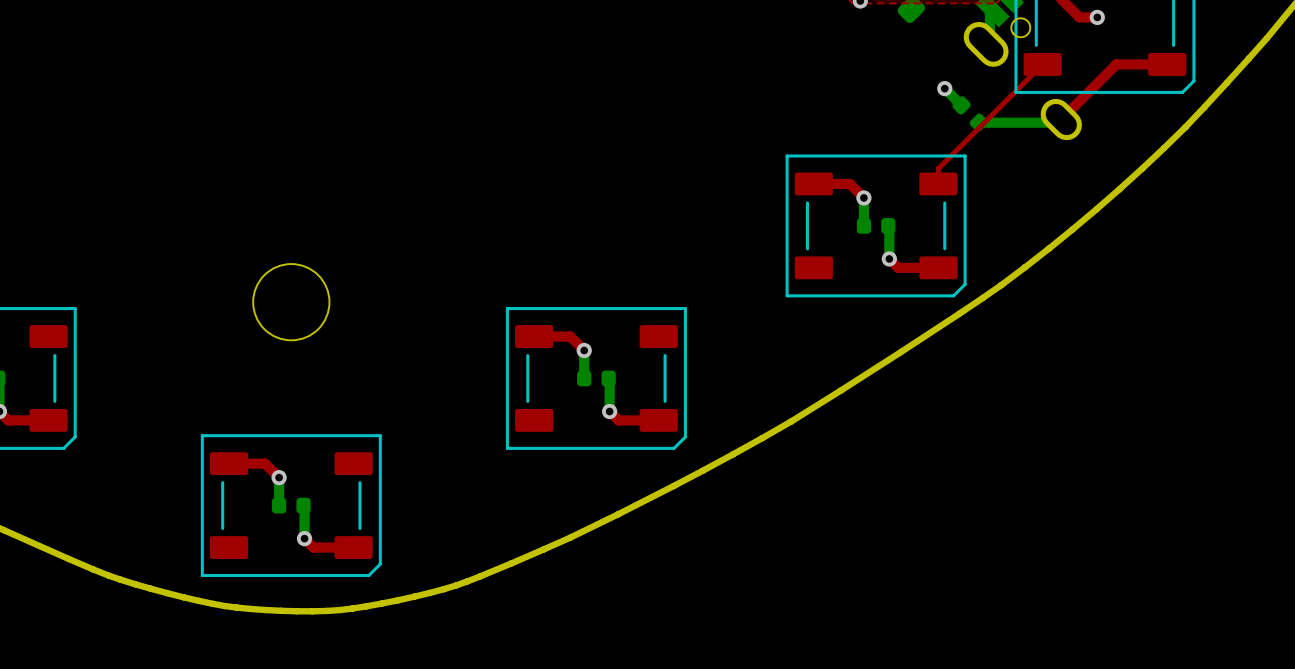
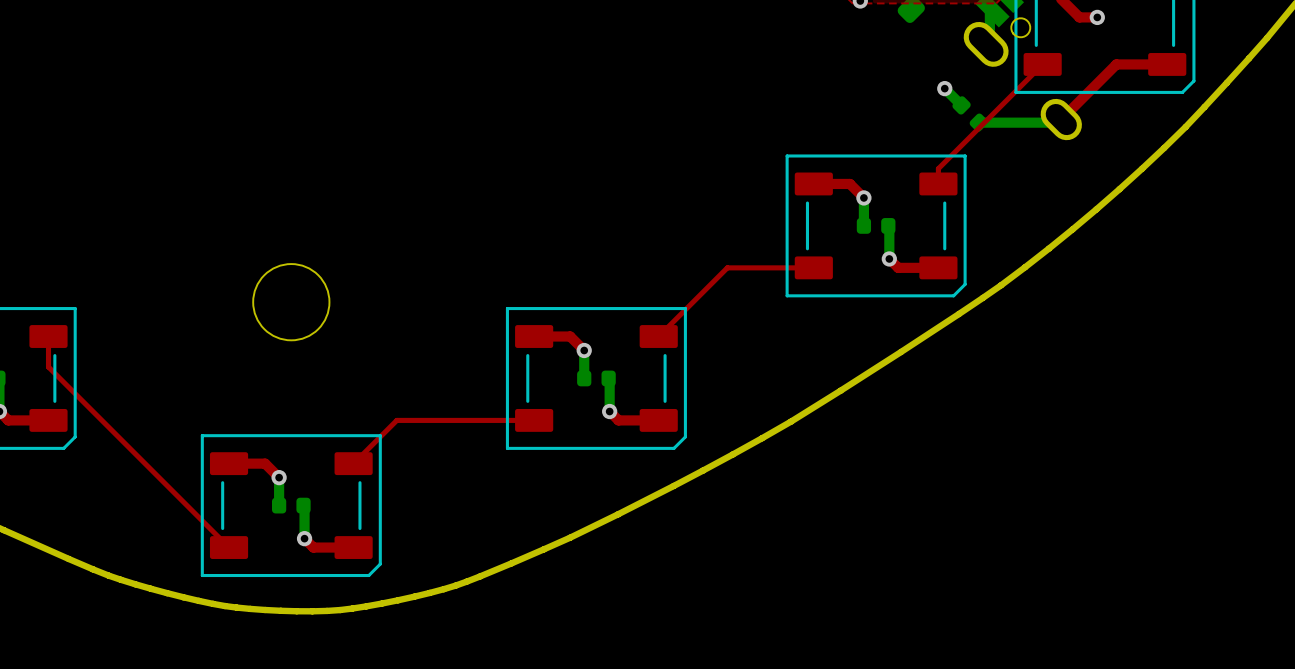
top track: none -> (813, 267) (727, 267) (658, 336)
top track: none -> (48, 336) (48, 367) (229, 547)
top track: none -> (534, 420) (396, 420) (353, 463)

